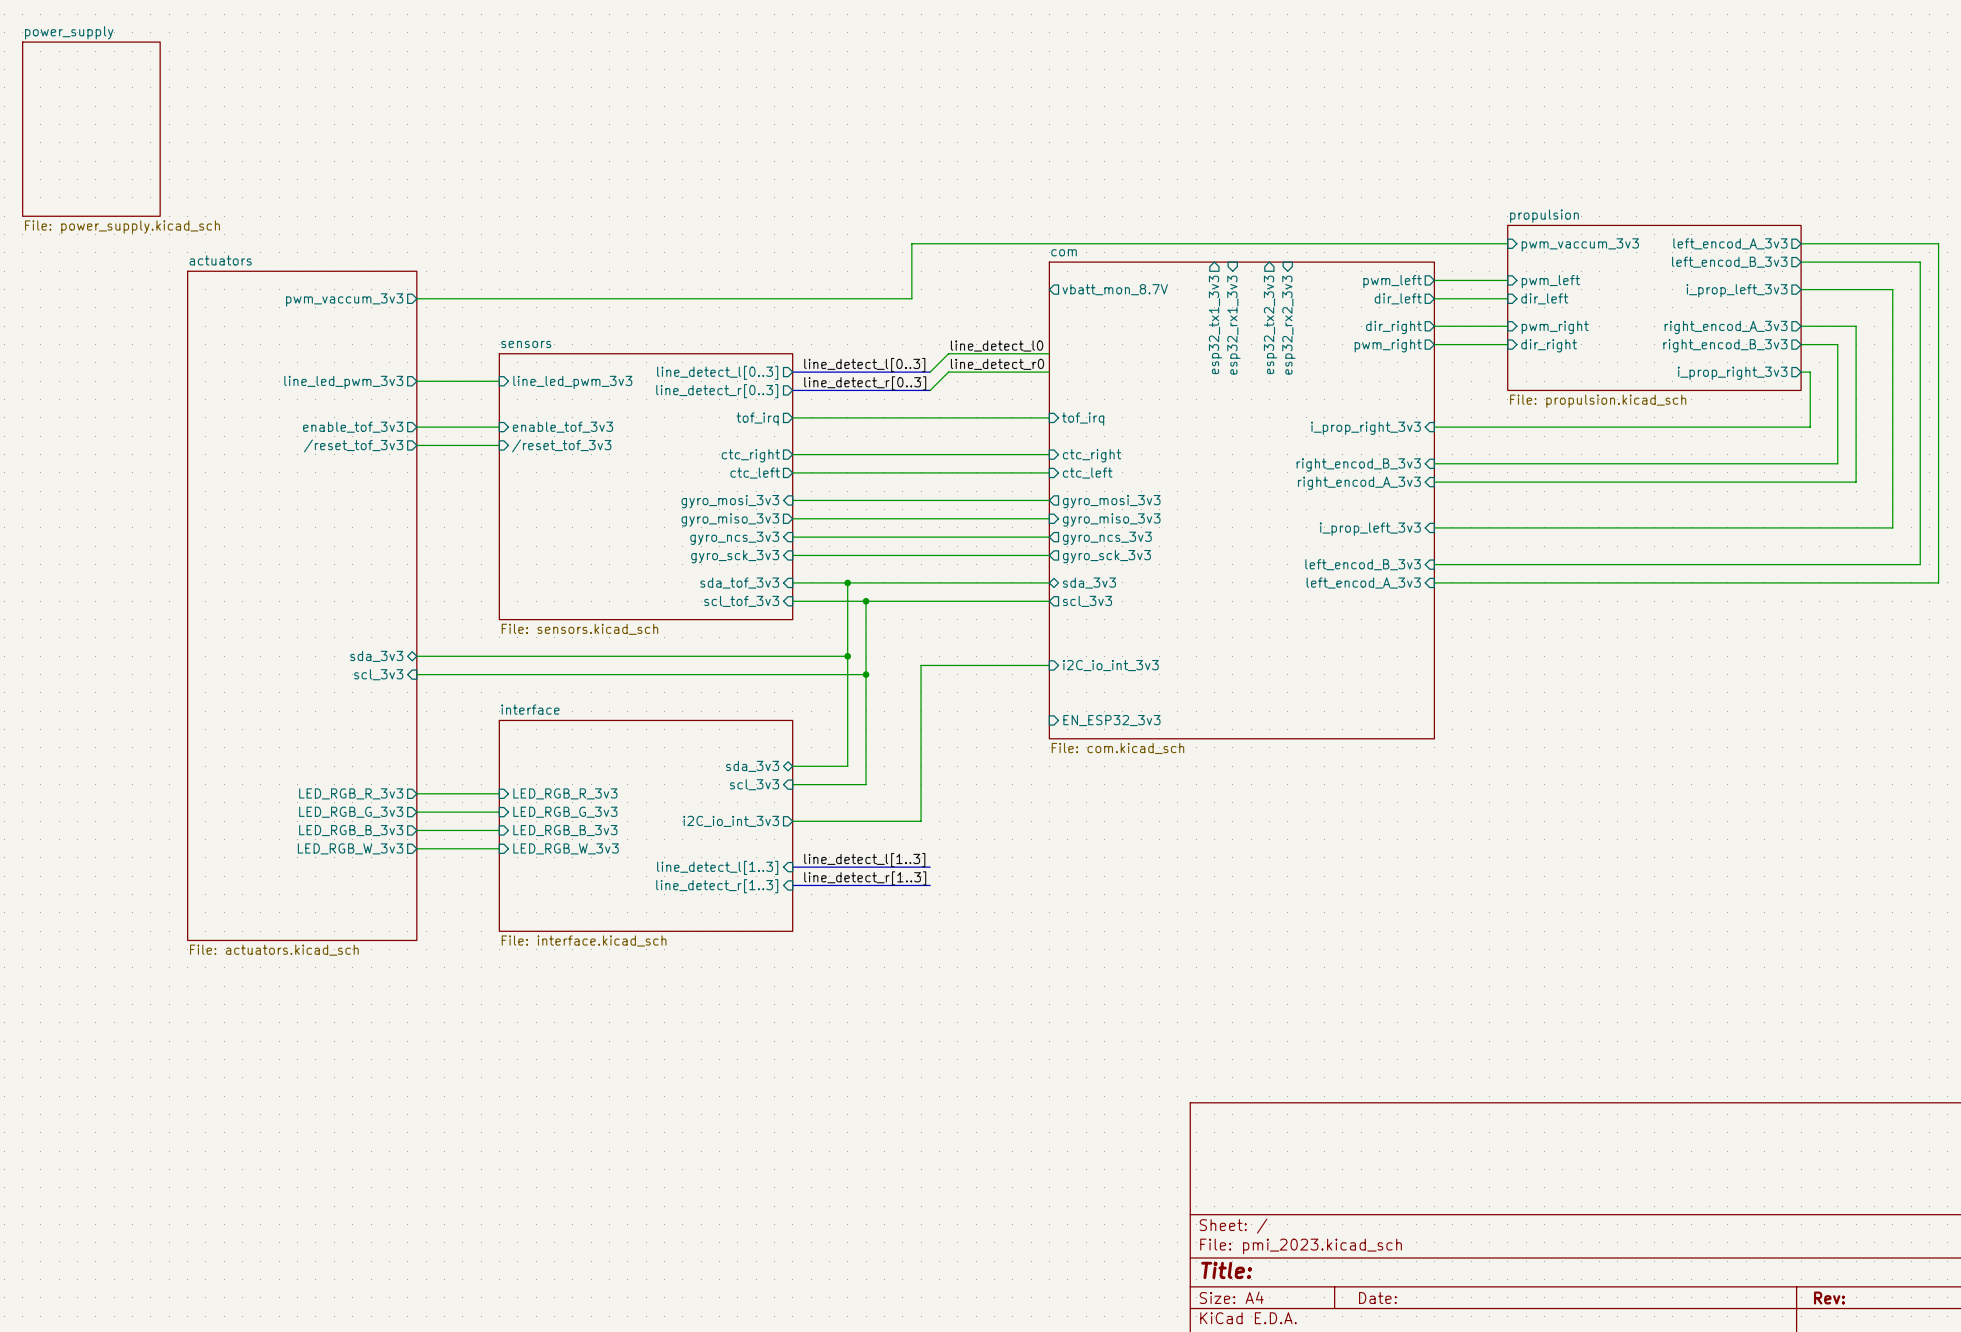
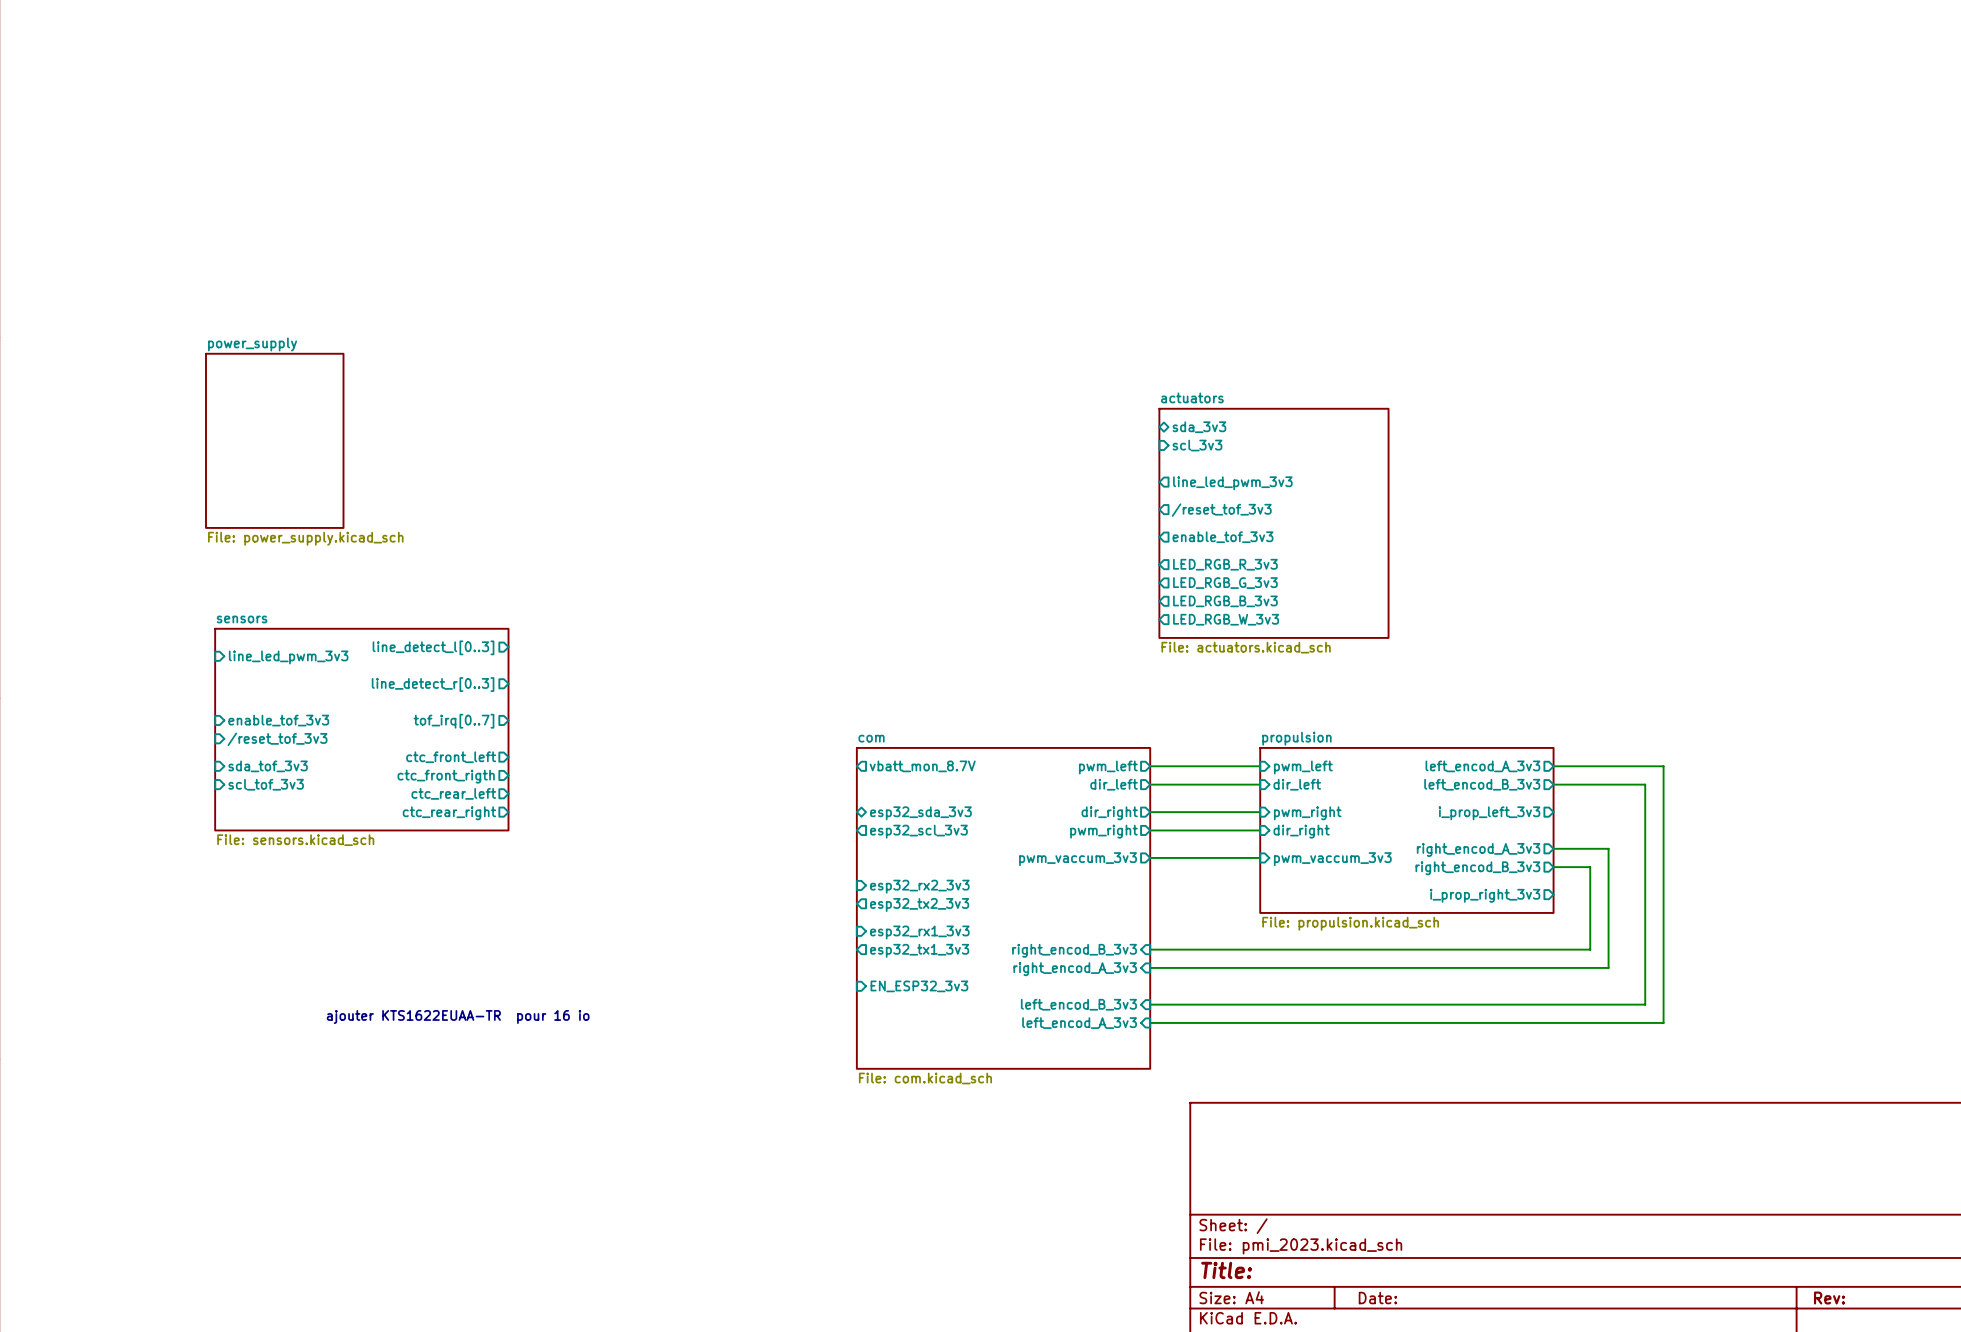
sheet power_supply: File: power_supply.kicad_sch (91, 129) -> none
wire: (1507, 243) (911, 243) (911, 298) (416, 298) -> none
sheet pin: left_encod_A_3v3 (1730, 243) -> none
wire: (1801, 243) (1938, 243) (1938, 582) (1434, 582) -> none
sheet pin: pwm_vaccum_3v3 (1580, 244) -> none
sheet pin: left_encod_B_3v3 (1729, 262) -> none
wire: (1801, 262) (1920, 262) (1920, 564) (1434, 564) -> none
wire: (1434, 280) (1507, 280) -> none
sheet pin: pwm_left (1392, 281) -> none
sheet pin: pwm_left (1550, 281) -> none
sheet pin: vbatt_mon_8.7V (1115, 289) -> none
wire: (1801, 289) (1892, 289) (1892, 527) (1434, 527) -> none
sheet pin: i_prop_left_3v3 (1736, 290) -> none
sheet pin: dir_left (1398, 298) -> none
wire: (1434, 298) (1507, 298) -> none
sheet pin: dir_left (1544, 298) -> none
sheet pin: pwm_vaccum_3v3 (344, 299) -> none
sheet propulsion: File: propulsion.kicad_sch (1654, 307) -> none
sheet pin: esp32_tx1_3v3 (1215, 324) -> none
sheet pin: esp32_tx2_3v3 (1270, 324) -> none
sheet pin: esp32_rx1_3v3 (1233, 325) -> none
sheet pin: esp32_rx2_3v3 (1288, 325) -> none
wire: (1434, 326) (1507, 326) -> none
wire: (1801, 326) (1856, 326) (1856, 482) (1434, 482) -> none
sheet pin: dir_right (1393, 327) -> none
sheet pin: pwm_right (1555, 327) -> none
sheet pin: right_encod_A_3v3 (1726, 327) -> none
wire: (1434, 344) (1507, 344) -> none
wire: (1801, 344) (1837, 344) (1837, 463) (1434, 463) -> none
sheet pin: pwm_right (1388, 345) -> none
sheet pin: dir_right (1549, 345) -> none
sheet pin: right_encod_B_3v3 (1725, 345) -> none
label: line_detect_l0 (997, 346) -> none
wire: (1049, 353) (948, 353) (930, 372) -> none
label: line_detect_r0 (997, 364) -> none
label: line_detect_l[0..3] (864, 365) -> none
sheet pin: line_detect_l[0..3] (717, 372) -> none
bus: (792, 372) (930, 372) -> none
wire: (1049, 372) (948, 372) (930, 390) -> none
wire: (1801, 372) (1810, 372) (1810, 427) (1434, 427) -> none
sheet pin: i_prop_right_3v3 (1732, 373) -> none
wire: (416, 381) (499, 381) -> none
sheet pin: line_led_pwm_3v3 (343, 382) -> none
sheet pin: line_led_pwm_3v3 (572, 382) -> none
label: line_detect_r[0..3] (865, 383) -> none
bus: (792, 390) (930, 390) -> none
sheet pin: line_detect_r[0..3] (717, 391) -> none
wire: (792, 417) (1049, 417) -> none
sheet pin: tof_irq (757, 419) -> none
sheet pin: tof_irq (1083, 419) -> none
sheet pin: enable_tof_3v3 (353, 427) -> none
wire: (416, 427) (499, 427) -> none
sheet pin: enable_tof_3v3 (562, 427) -> none
sheet pin: none -> sda_3v3 (1199, 427)
sheet pin: i_prop_right_3v3 (1365, 428) -> none
sheet power_supply: none -> File: power_supply.kicad_sch (274, 440)
sheet pin: /reset_tof_3v3 (353, 445) -> none
wire: (416, 445) (499, 445) -> none
sheet pin: /reset_tof_3v3 (561, 445) -> none
sheet pin: none -> scl_3v3 (1197, 445)
wire: (792, 454) (1049, 454) -> none
sheet pin: ctc_right (750, 455) -> none
sheet pin: ctc_right (1092, 455) -> none
sheet pin: right_encod_B_3v3 (1358, 464) -> none
wire: (792, 472) (1049, 472) -> none
sheet pin: ctc_left (755, 473) -> none
sheet pin: ctc_left (1087, 473) -> none
sheet pin: none -> line_led_pwm_3v3 (1232, 483)
sheet pin: right_encod_A_3v3 (1359, 483) -> none
sheet sensors: File: sensors.kicad_sch (646, 486) -> none
wire: (792, 500) (1049, 500) -> none
sheet com: File: com.kicad_sch (1241, 500) -> none
sheet pin: gyro_mosi_3v3 (730, 501) -> none
sheet pin: gyro_mosi_3v3 (1111, 501) -> none
sheet pin: none -> /reset_tof_3v3 (1221, 510)
wire: (792, 518) (1049, 518) -> none
sheet pin: gyro_miso_3v3 (730, 519) -> none
sheet pin: gyro_miso_3v3 (1111, 519) -> none
sheet actuators: none -> File: actuators.kicad_sch (1273, 523)
sheet pin: i_prop_left_3v3 (1370, 529) -> none
wire: (792, 537) (1049, 537) -> none
sheet pin: none -> enable_tof_3v3 (1223, 537)
sheet pin: gyro_ncs_3v3 (734, 538) -> none
sheet pin: gyro_ncs_3v3 (1107, 538) -> none
wire: (792, 555) (1049, 555) -> none
sheet pin: gyro_sck_3v3 (735, 556) -> none
sheet pin: gyro_sck_3v3 (1106, 556) -> none
sheet pin: none -> LED_RGB_R_3v3 (1225, 564)
sheet pin: left_encod_B_3v3 (1363, 564) -> none
wire: (792, 582) (1049, 582) -> none
wire: (847, 582) (847, 766) (792, 766) -> none
junction: (847, 582) -> none
sheet pin: sda_tof_3v3 (739, 583) -> none
sheet pin: sda_3v3 (1089, 583) -> none
sheet pin: none -> LED_RGB_G_3v3 (1225, 583)
sheet pin: left_encod_A_3v3 (1363, 583) -> none
sheet pin: scl_tof_3v3 (741, 601) -> none
wire: (792, 601) (1049, 601) -> none
wire: (866, 601) (866, 784) (792, 784) -> none
junction: (866, 601) -> none
sheet pin: scl_3v3 (1087, 601) -> none
sheet pin: none -> LED_RGB_B_3v3 (1225, 601)
sheet actuators: File: actuators.kicad_sch (302, 605) -> none
sheet pin: none -> LED_RGB_W_3v3 (1226, 619)
sheet pin: none -> line_detect_l[0..3] (433, 647)
sheet pin: sda_3v3 (376, 656) -> none
wire: (416, 656) (847, 656) -> none
junction: (847, 656) -> none
sheet pin: none -> line_led_pwm_3v3 (288, 657)
wire: (1049, 665) (921, 665) (921, 821) (792, 821) -> none
sheet pin: i2C_io_int_3v3 (1110, 665) -> none
sheet pin: scl_3v3 (378, 674) -> none
wire: (416, 674) (866, 674) -> none
junction: (866, 674) -> none
sheet pin: none -> line_detect_r[0..3] (433, 684)
sheet pin: none -> enable_tof_3v3 (278, 720)
sheet pin: EN_ESP32_3v3 (1111, 720) -> none
sheet pin: none -> tof_irq[0..7] (454, 721)
sheet sensors: none -> File: sensors.kicad_sch (361, 729)
sheet pin: none -> /reset_tof_3v3 (277, 739)
sheet pin: none -> ctc_front_left (451, 757)
sheet pin: none -> sda_tof_3v3 (268, 766)
sheet pin: sda_3v3 (752, 766) -> none
sheet pin: none -> vbatt_mon_8.7V (922, 766)
wire: none -> (1150, 766) (1260, 766)
sheet pin: none -> left_encod_A_3v3 (1482, 766)
wire: none -> (1553, 766) (1663, 766) (1663, 1022) (1150, 1022)
sheet pin: none -> pwm_left (1108, 767)
sheet pin: none -> pwm_left (1303, 767)
sheet pin: none -> ctc_front_rigth (446, 776)
sheet pin: none -> scl_tof_3v3 (266, 784)
sheet pin: scl_3v3 (754, 784) -> none
sheet pin: none -> dir_left (1114, 784)
wire: none -> (1150, 784) (1260, 784)
sheet pin: none -> dir_left (1297, 784)
sheet pin: none -> left_encod_B_3v3 (1482, 784)
wire: none -> (1553, 784) (1645, 784) (1645, 1004) (1150, 1004)
sheet pin: LED_RGB_R_3v3 (351, 793) -> none
wire: (416, 793) (499, 793) -> none
sheet pin: none -> ctc_rear_left (453, 793)
sheet pin: LED_RGB_R_3v3 (565, 793) -> none
sheet pin: LED_RGB_G_3v3 (351, 812) -> none
wire: (416, 812) (499, 812) -> none
sheet pin: LED_RGB_G_3v3 (565, 812) -> none
wire: none -> (1150, 812) (1260, 812)
sheet pin: none -> ctc_rear_right (449, 813)
sheet pin: none -> esp32_sda_3v3 (920, 813)
sheet pin: none -> dir_right (1109, 813)
sheet pin: none -> pwm_right (1307, 813)
sheet pin: none -> i_prop_left_3v3 (1489, 813)
sheet pin: i2C_io_int_3v3 (731, 821) -> none
sheet interface: File: interface.kicad_sch (646, 825) -> none
sheet pin: LED_RGB_B_3v3 (351, 830) -> none
sheet pin: LED_RGB_B_3v3 (565, 830) -> none
wire: none -> (1150, 830) (1260, 830)
sheet propulsion: none -> File: propulsion.kicad_sch (1406, 830)
sheet pin: none -> esp32_scl_3v3 (918, 831)
sheet pin: none -> pwm_right (1104, 831)
sheet pin: none -> dir_right (1301, 831)
sheet pin: LED_RGB_W_3v3 (350, 848) -> none
wire: (416, 848) (499, 848) -> none
sheet pin: LED_RGB_W_3v3 (566, 848) -> none
wire: none -> (1553, 848) (1608, 848) (1608, 967) (1150, 967)
sheet pin: none -> right_encod_A_3v3 (1478, 849)
wire: none -> (1150, 857) (1260, 857)
sheet pin: none -> pwm_vaccum_3v3 (1078, 859)
sheet pin: none -> pwm_vaccum_3v3 (1332, 859)
label: line_detect_l[1..3] (864, 860) -> none
sheet pin: line_detect_l[1..3] (717, 867) -> none
bus: (792, 867) (930, 867) -> none
wire: none -> (1553, 867) (1590, 867) (1590, 949) (1150, 949)
sheet pin: none -> right_encod_B_3v3 (1477, 868)
label: line_detect_r[1..3] (865, 878) -> none
bus: (792, 885) (930, 885) -> none
sheet pin: line_detect_r[1..3] (717, 886) -> none
sheet pin: none -> esp32_rx2_3v3 (919, 886)
sheet pin: none -> i_prop_right_3v3 (1485, 895)
sheet pin: none -> esp32_tx2_3v3 (919, 904)
sheet com: none -> File: com.kicad_sch (1003, 908)
sheet pin: none -> esp32_rx1_3v3 (919, 932)
sheet pin: none -> esp32_tx1_3v3 (919, 950)
sheet pin: none -> right_encod_B_3v3 (1074, 950)
sheet pin: none -> right_encod_A_3v3 (1075, 969)
sheet pin: none -> EN_ESP32_3v3 (919, 986)
sheet pin: none -> left_encod_B_3v3 (1078, 1004)
text: none -> ajouter KTS1622EUAA-TR pour 16 io (458, 1016)
sheet pin: none -> left_encod_A_3v3 (1079, 1023)

